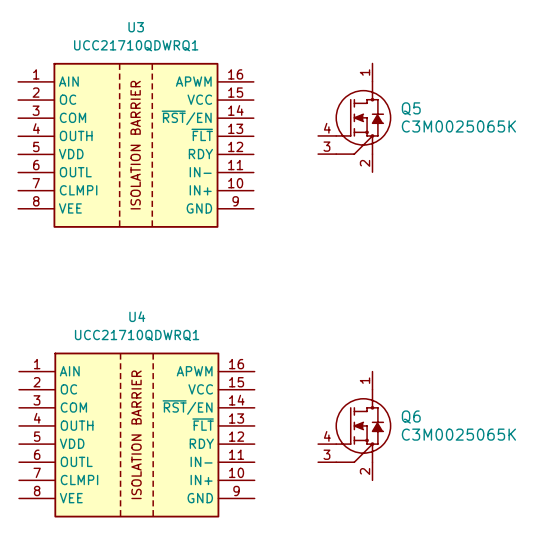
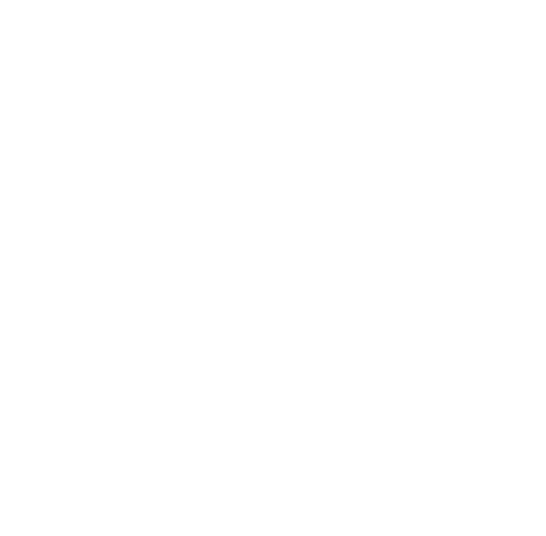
Q5: C3M0025065K (354, 117) -> none
U3: UCC21710QDWRQ1 (135, 145) -> none
Q6: C3M0025065K (354, 425) -> none
U4: UCC21710QDWRQ1 (136, 435) -> none

